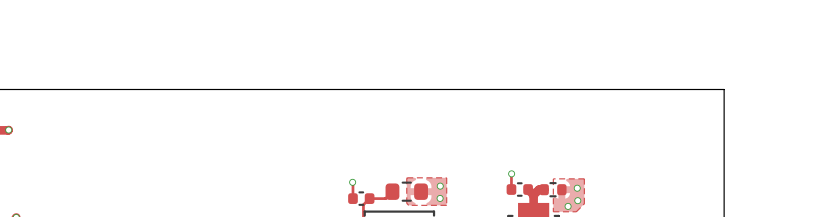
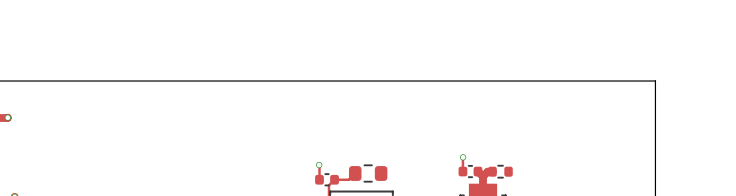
top zone outline: (446, 177) (406, 178) (406, 203) (408, 205) (446, 205) -> none
top zone outline: (446, 178) (446, 205) -> none
top zone outline: (553, 178) (584, 178) (584, 203) (576, 211) (553, 211) (553, 179) -> none
via: (440, 186) -> none
via: (577, 188) -> none
via: (440, 198) -> none
via: (577, 200) -> none
via: (568, 206) -> none

